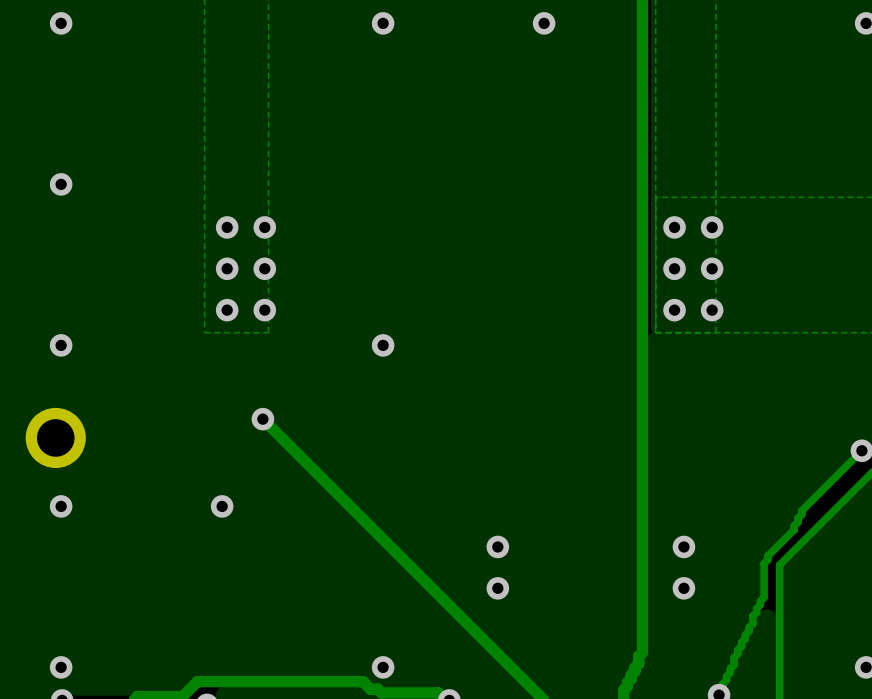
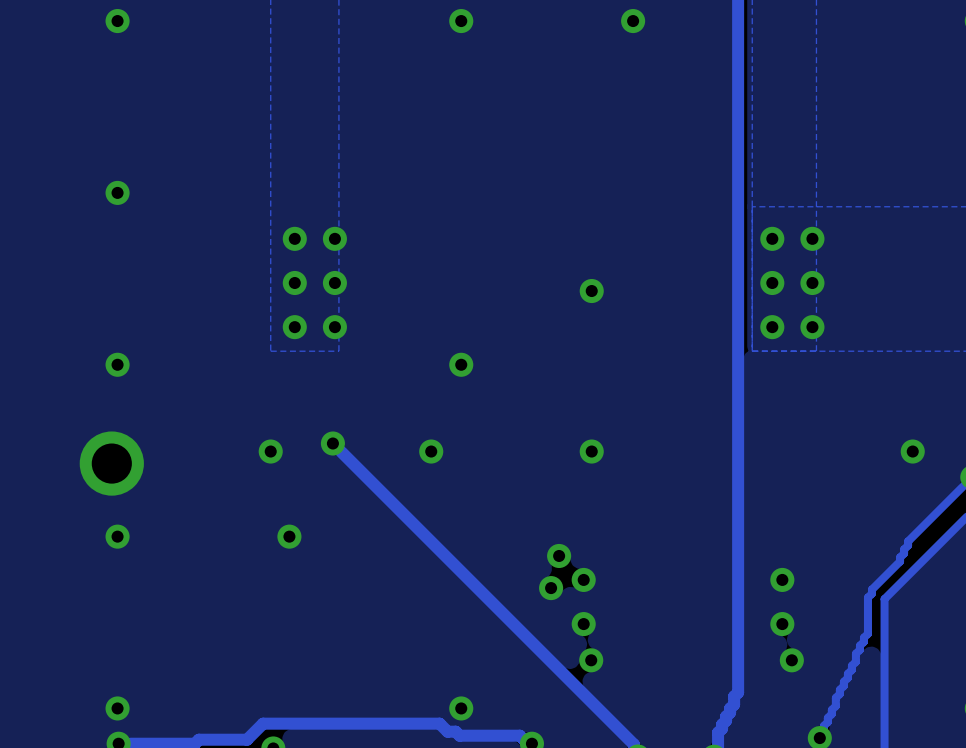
via: none -> (591, 291)
via: none -> (270, 451)
via: none -> (431, 451)
via: none -> (591, 451)
via: none -> (912, 451)
via: none -> (559, 555)
via: none -> (551, 588)
via: none -> (591, 660)
via: none -> (791, 660)

